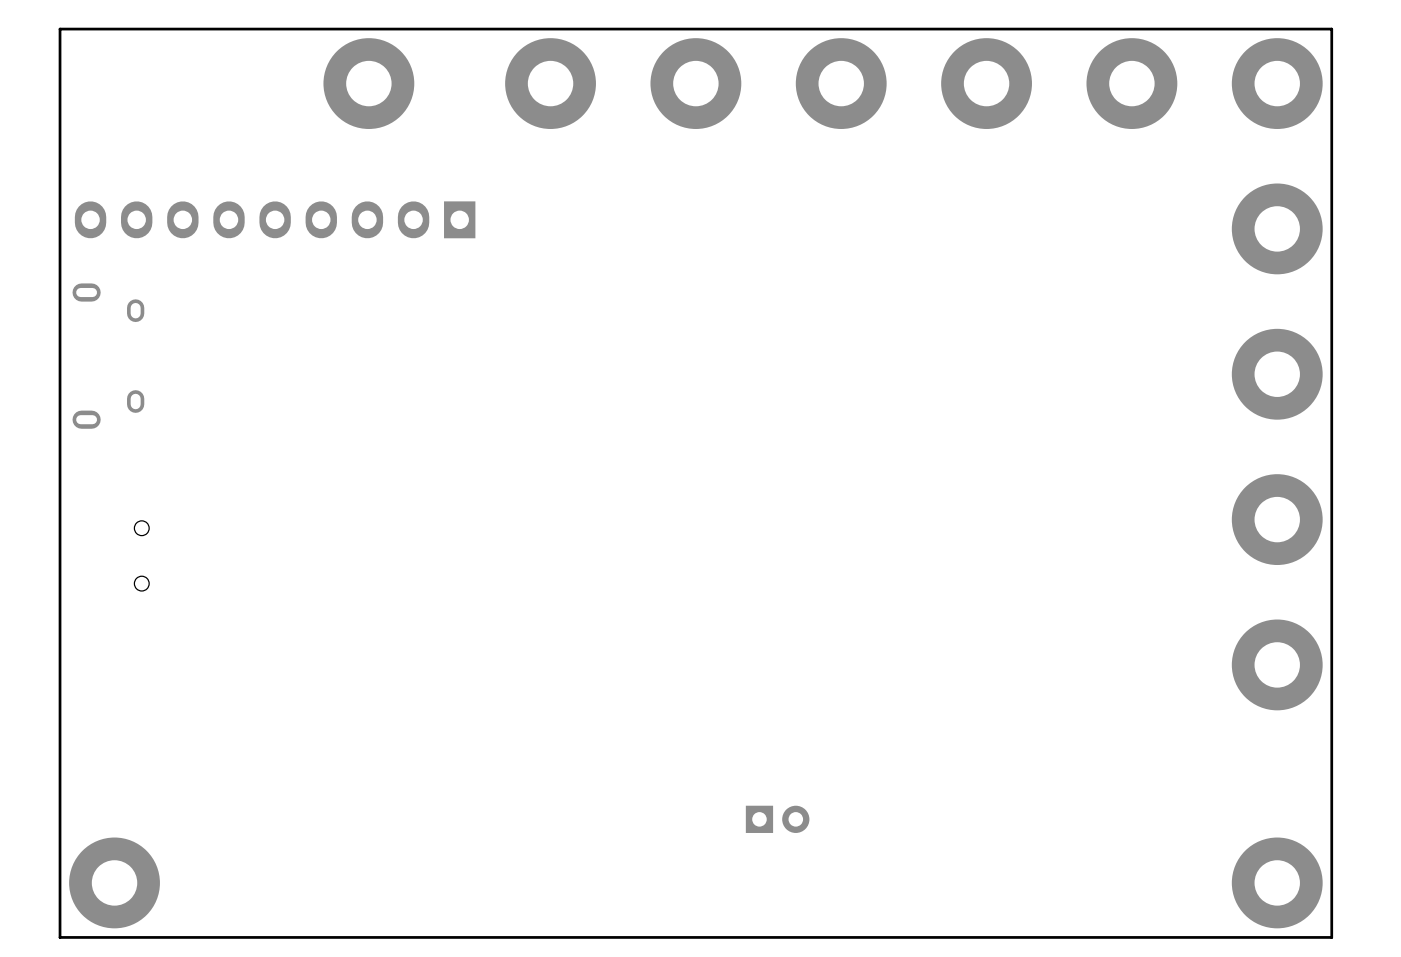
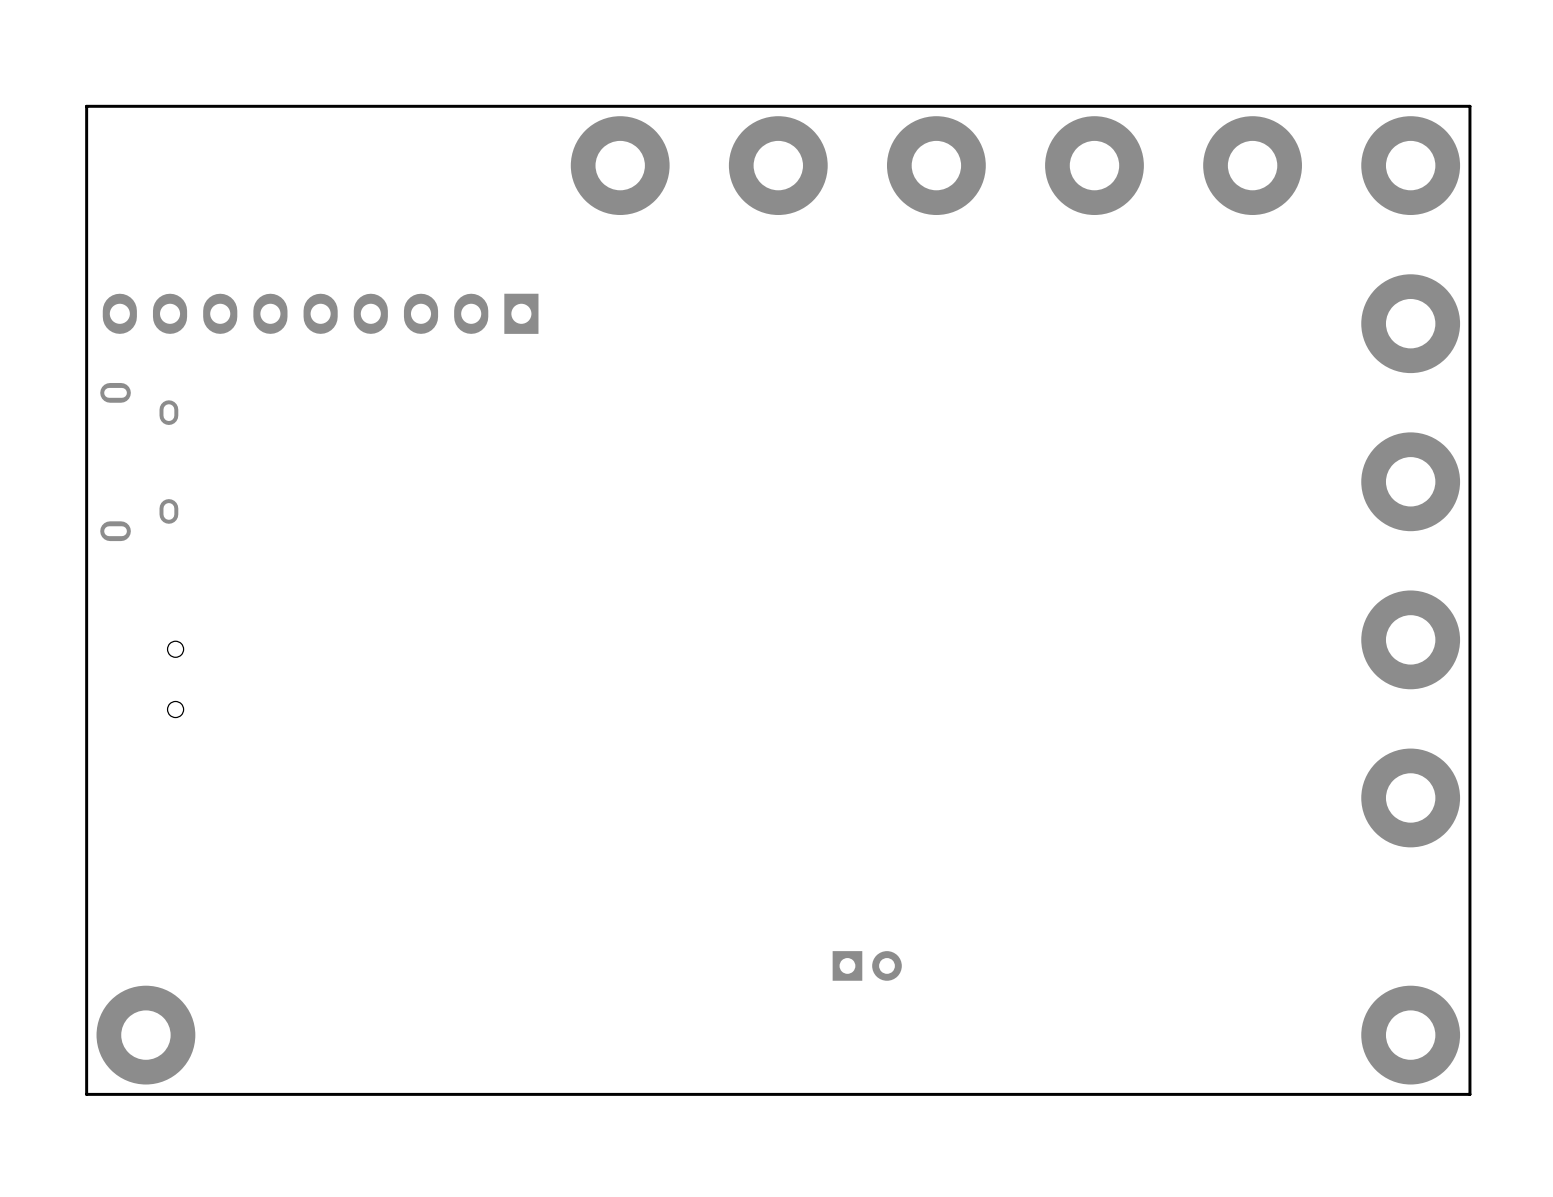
part: (368, 83) -> none

